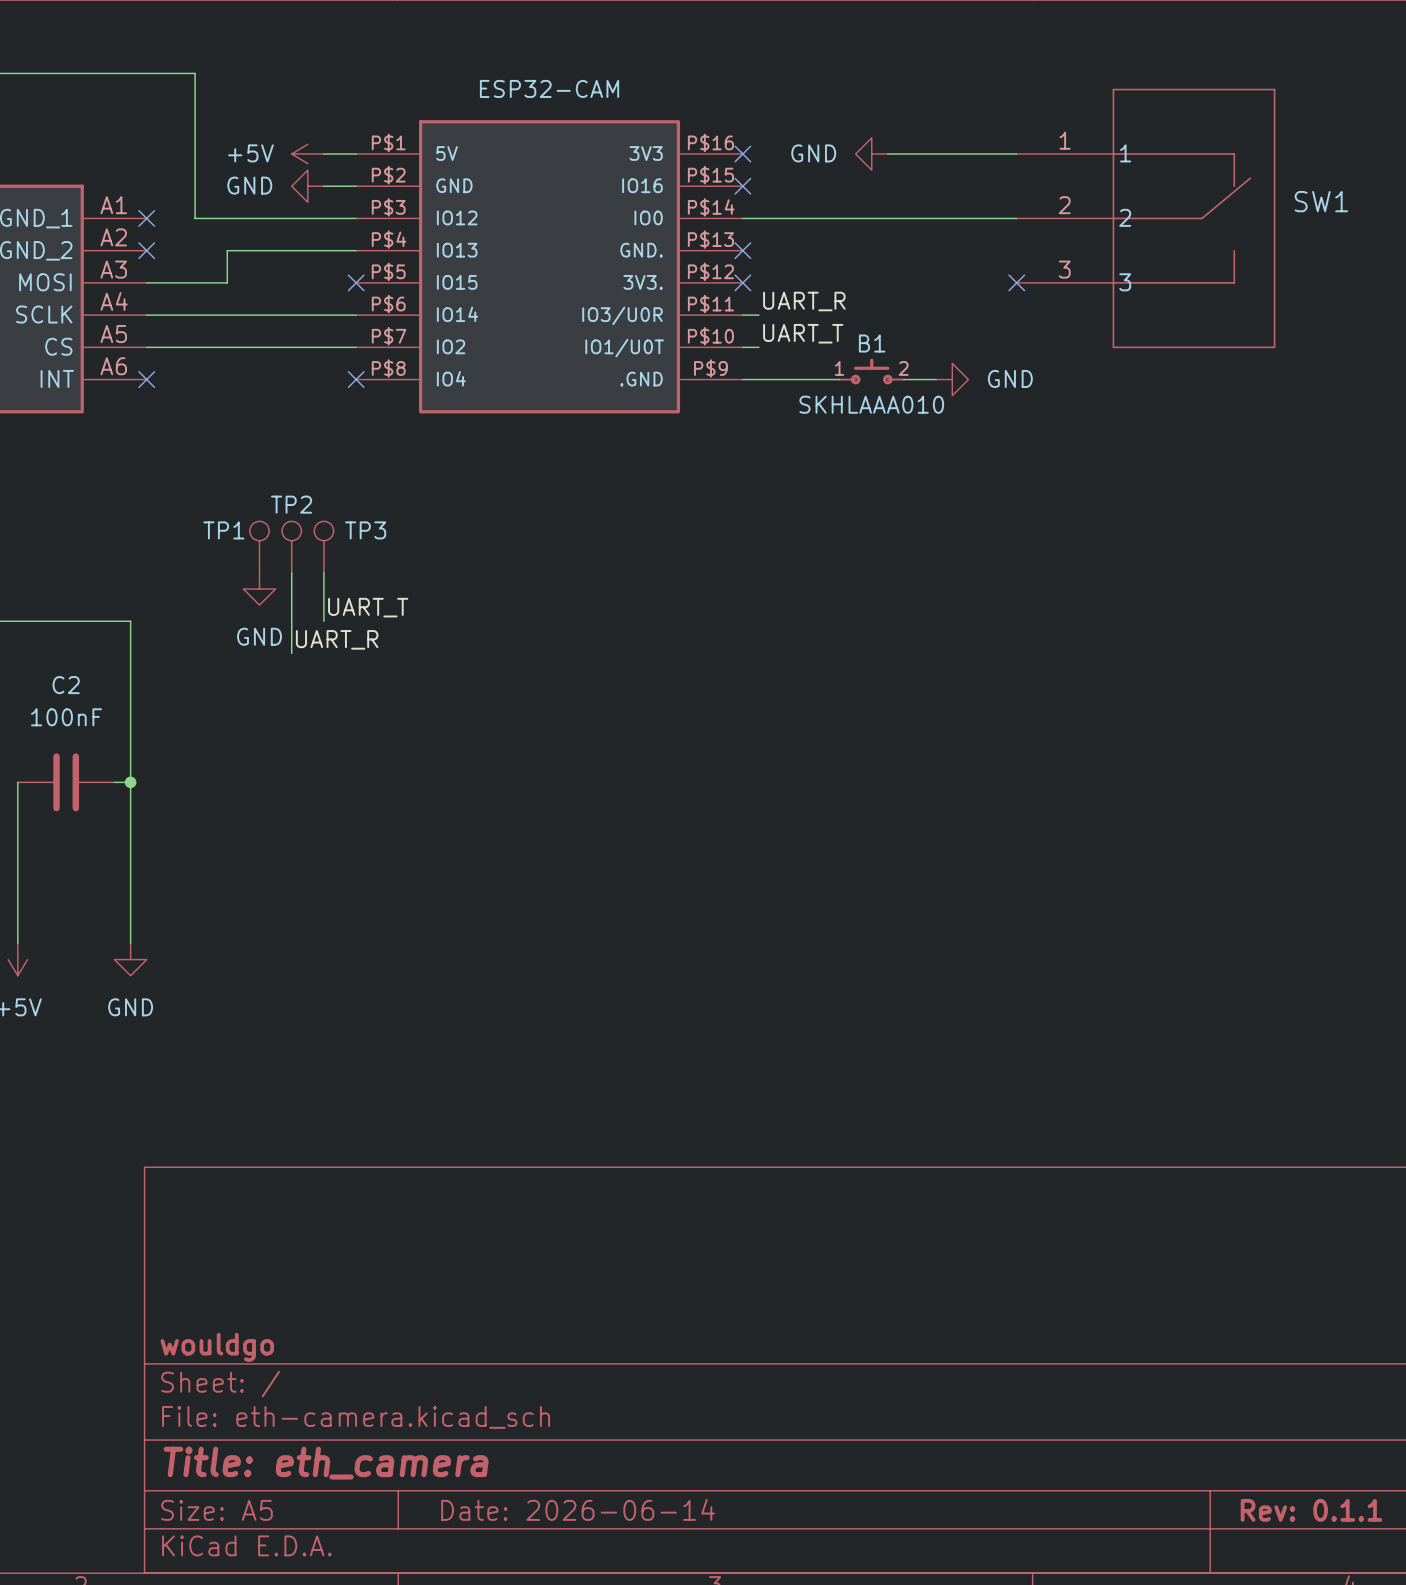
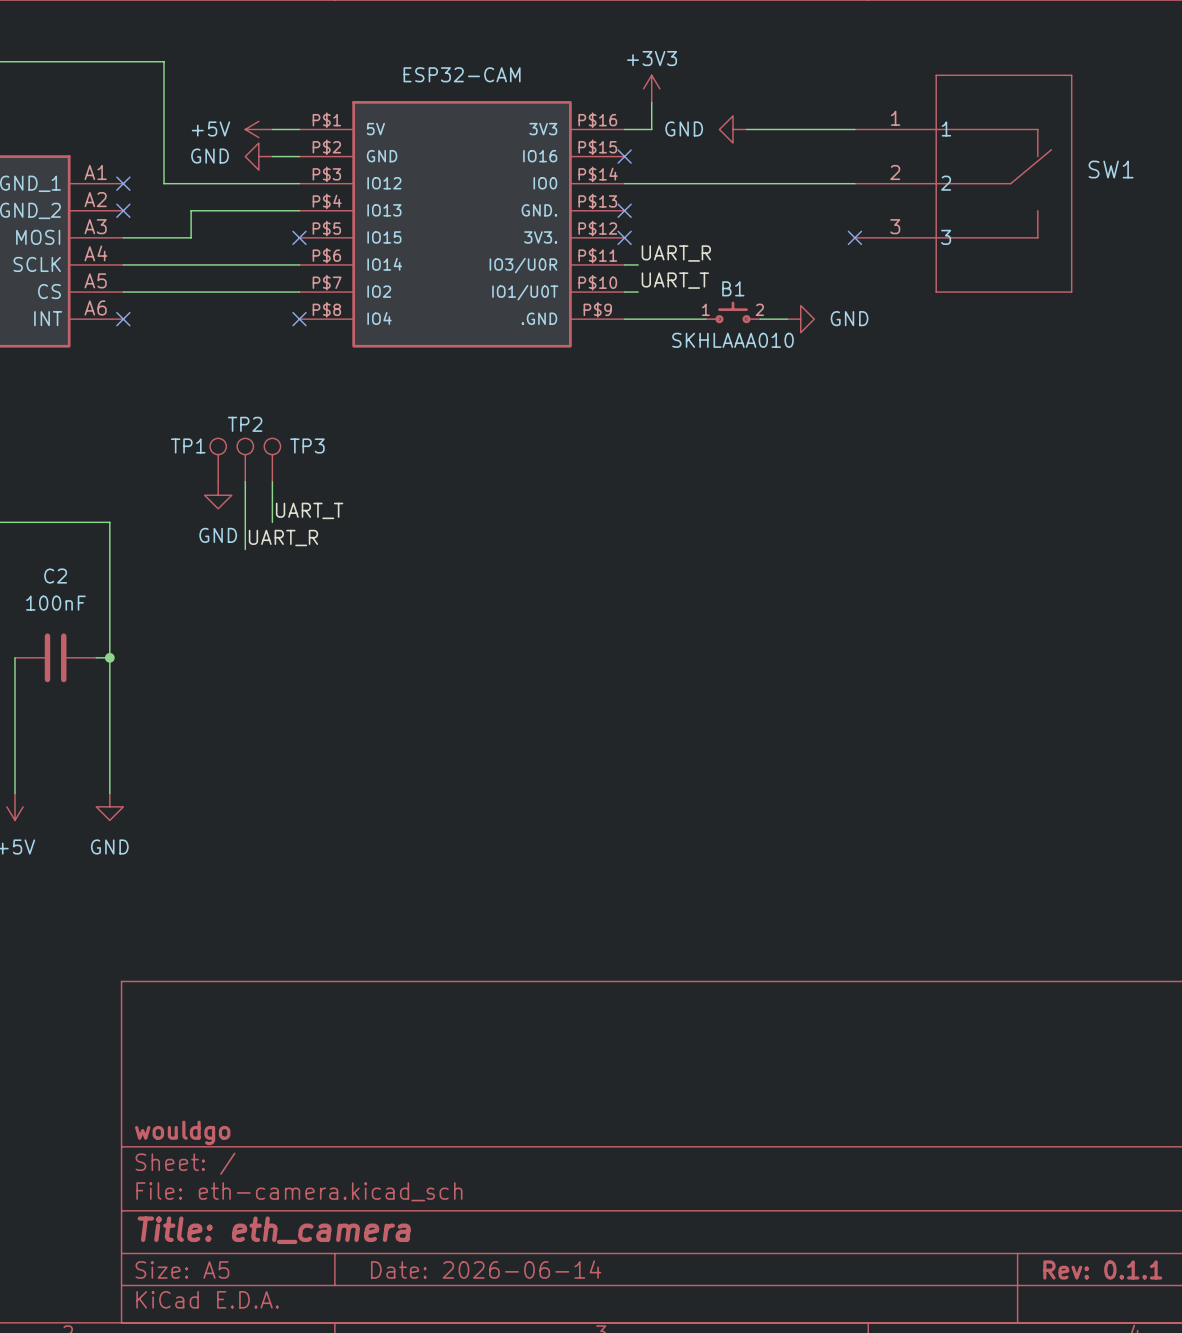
power symbol: none -> +3V3 (651, 88)
wire: none -> (651, 102) (651, 129) (624, 129)
no-connect mark: (742, 153) -> none

